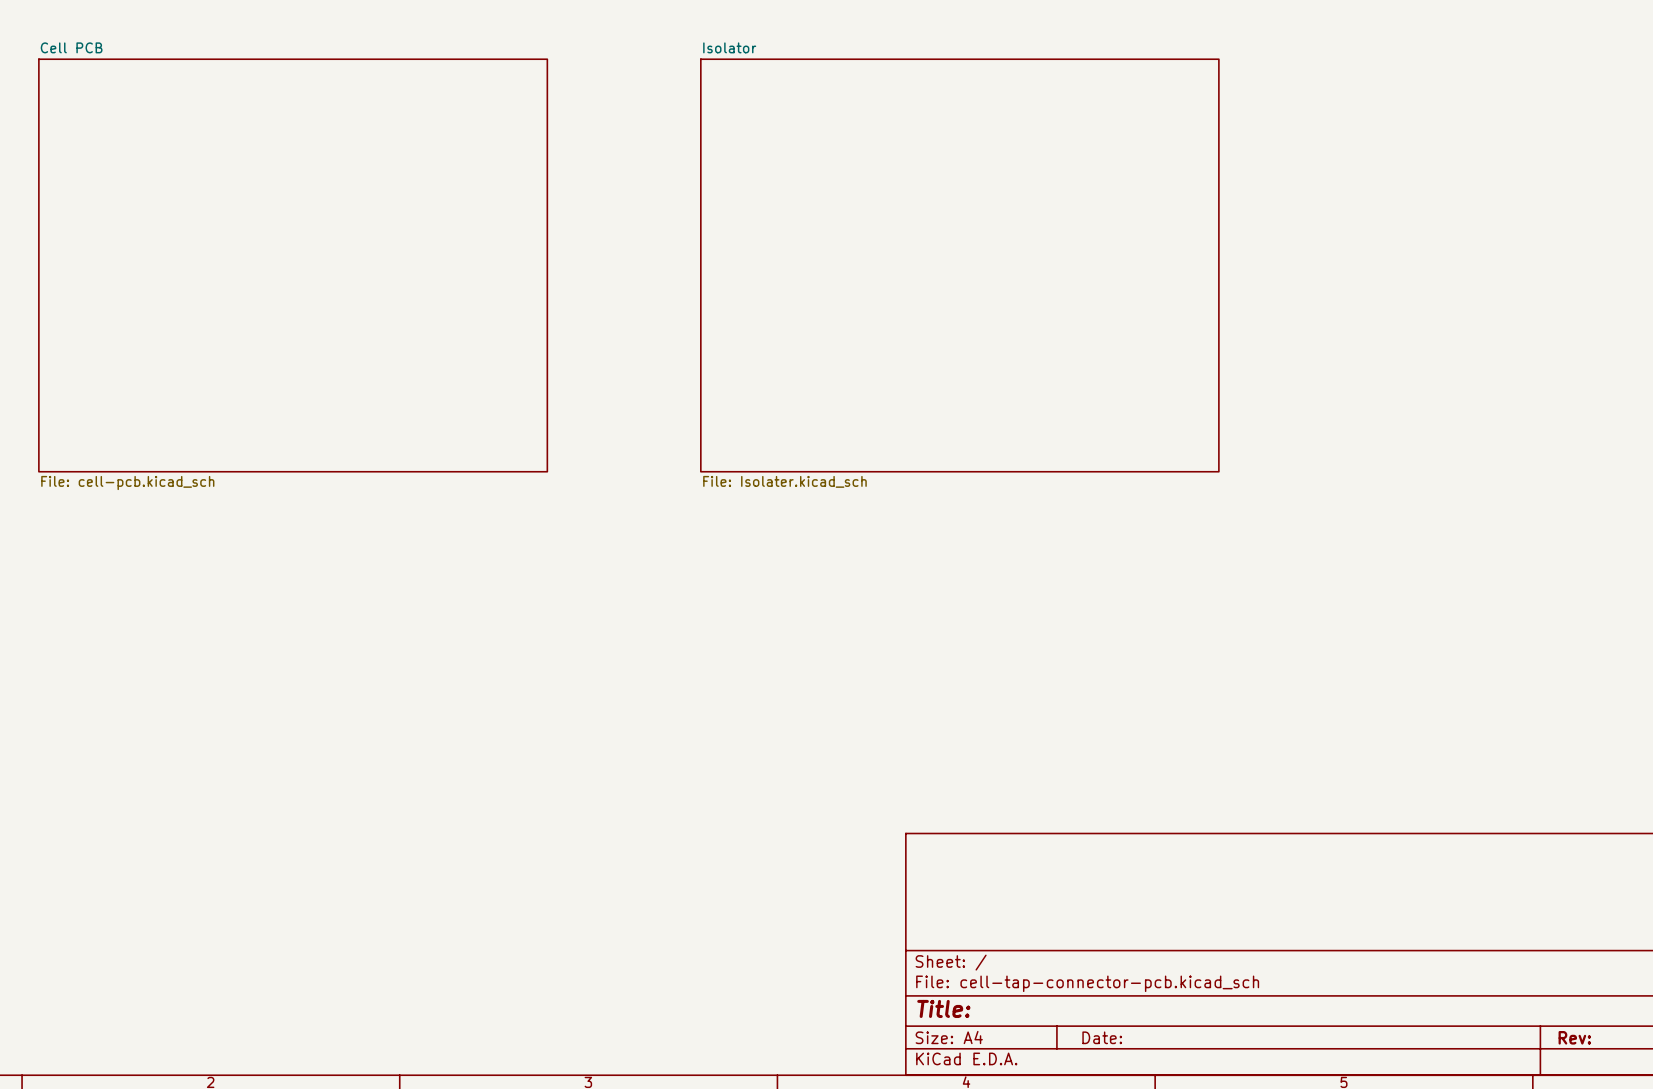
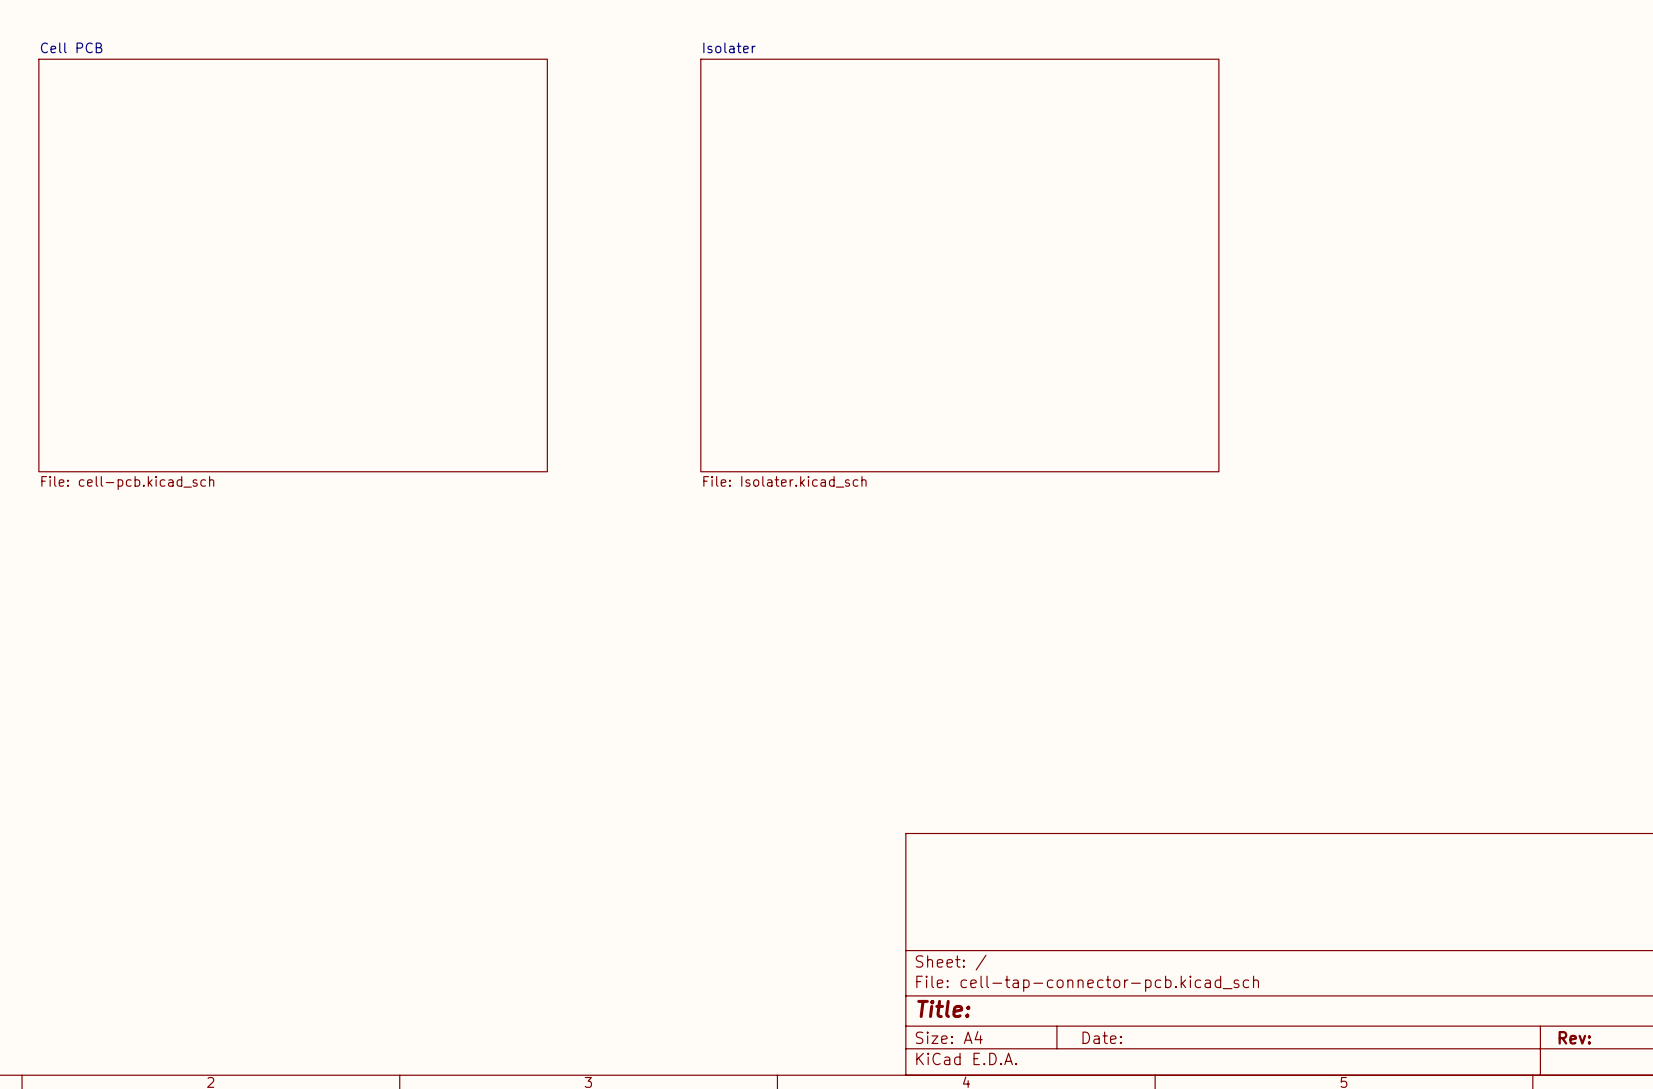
sheet Isolator name: Isolator (729, 47) -> Isolater (729, 47)

